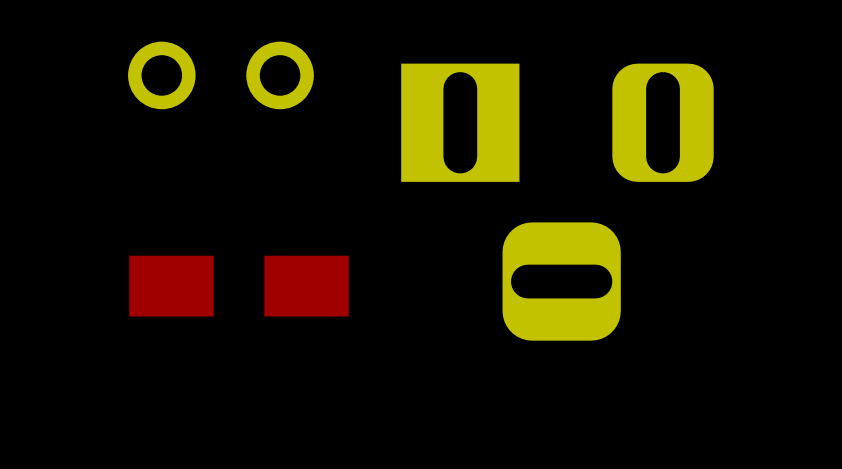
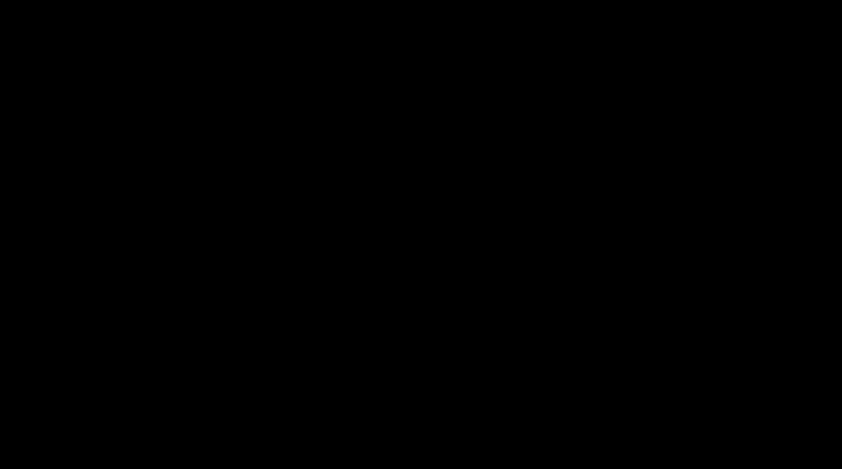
part: (220, 75) -> none
part: (557, 202) -> none
part: (239, 286) -> none

